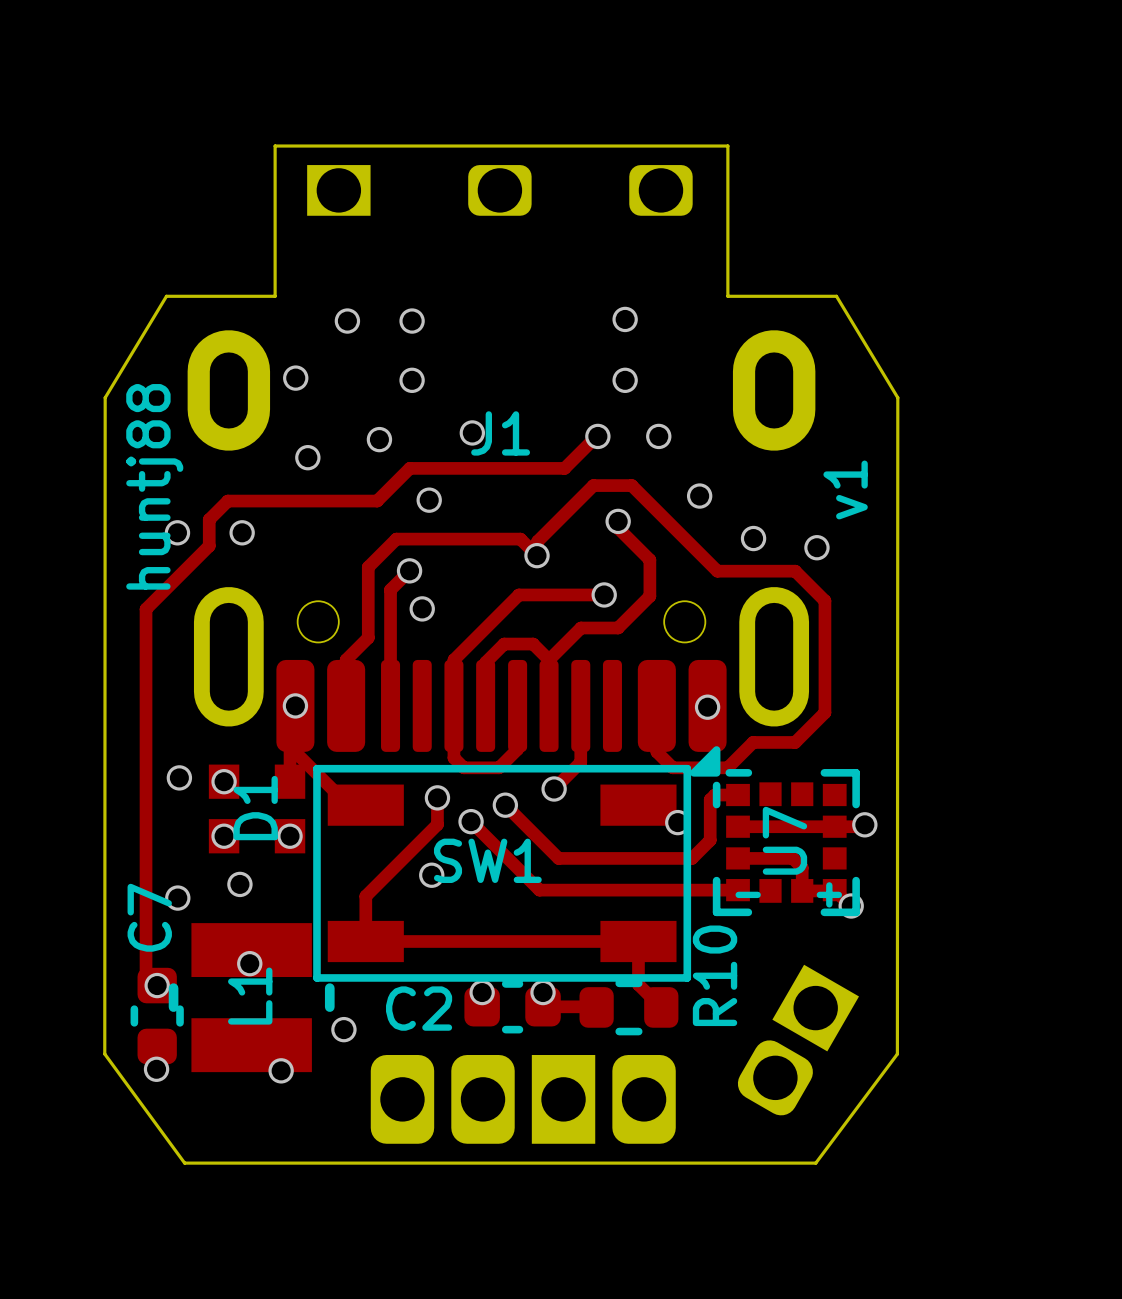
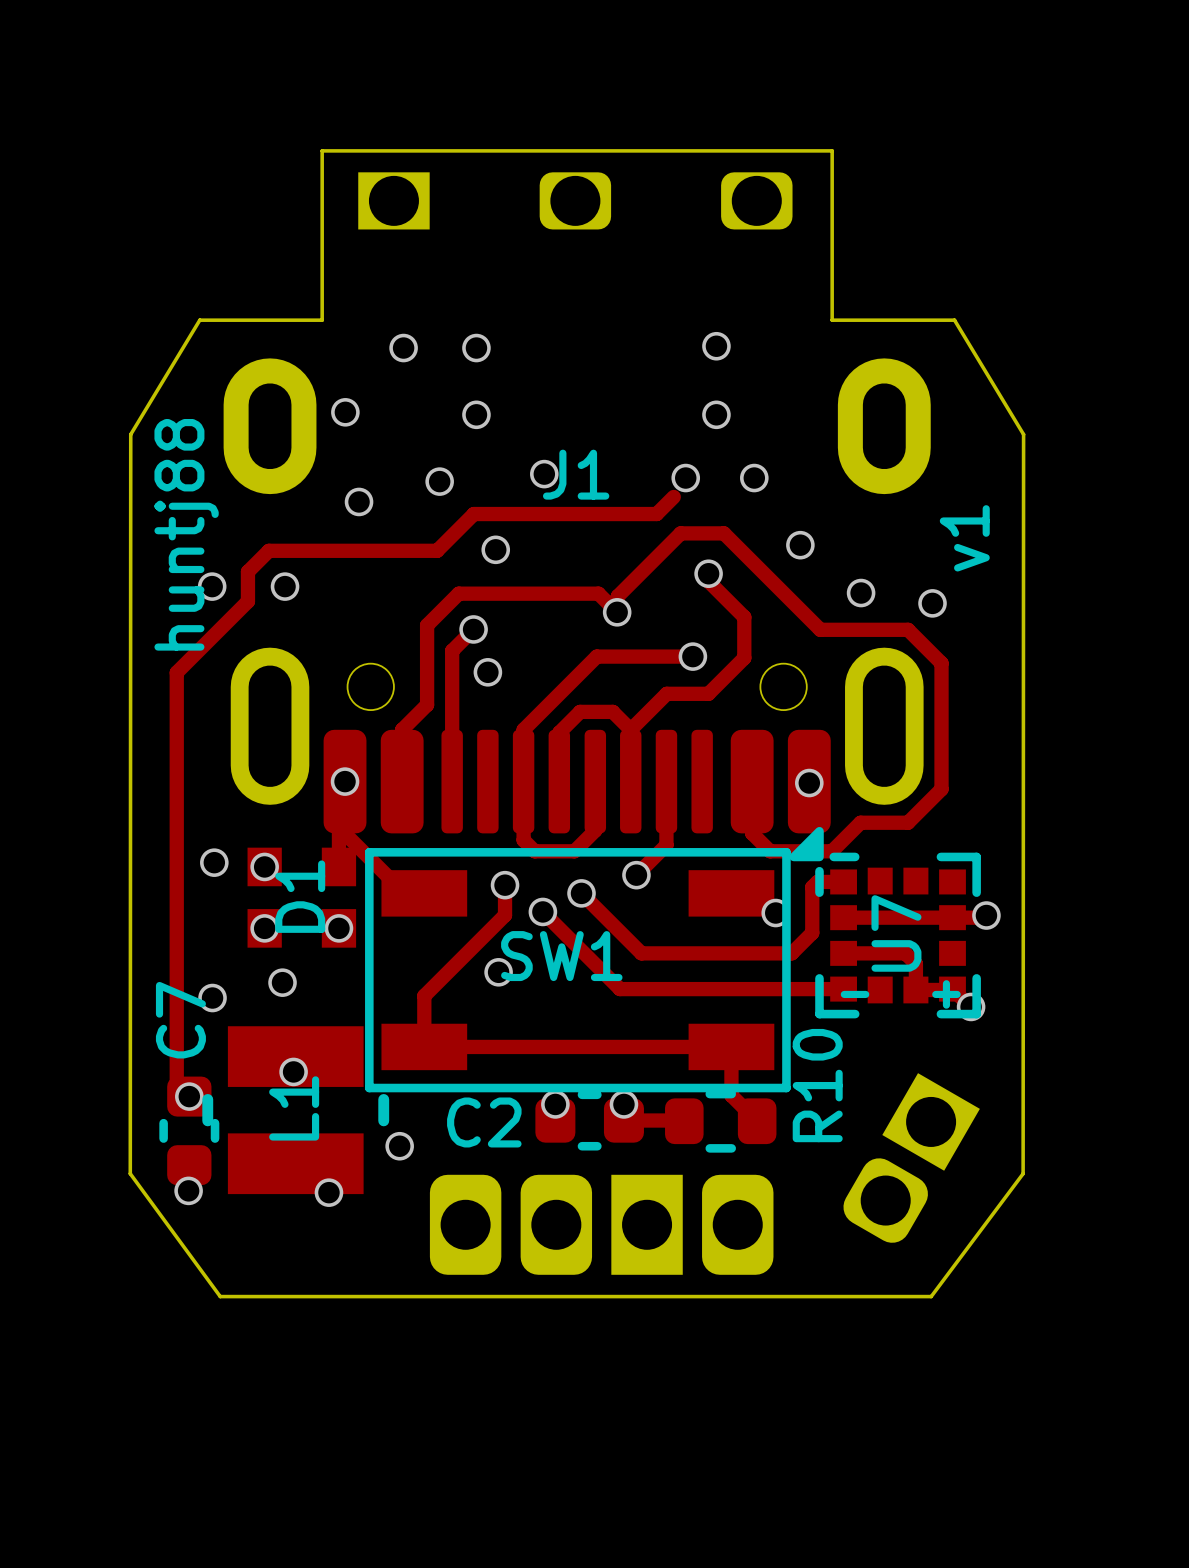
track: (596, 436) (564, 468) -> (673, 496) (656, 514) (648, 514)

